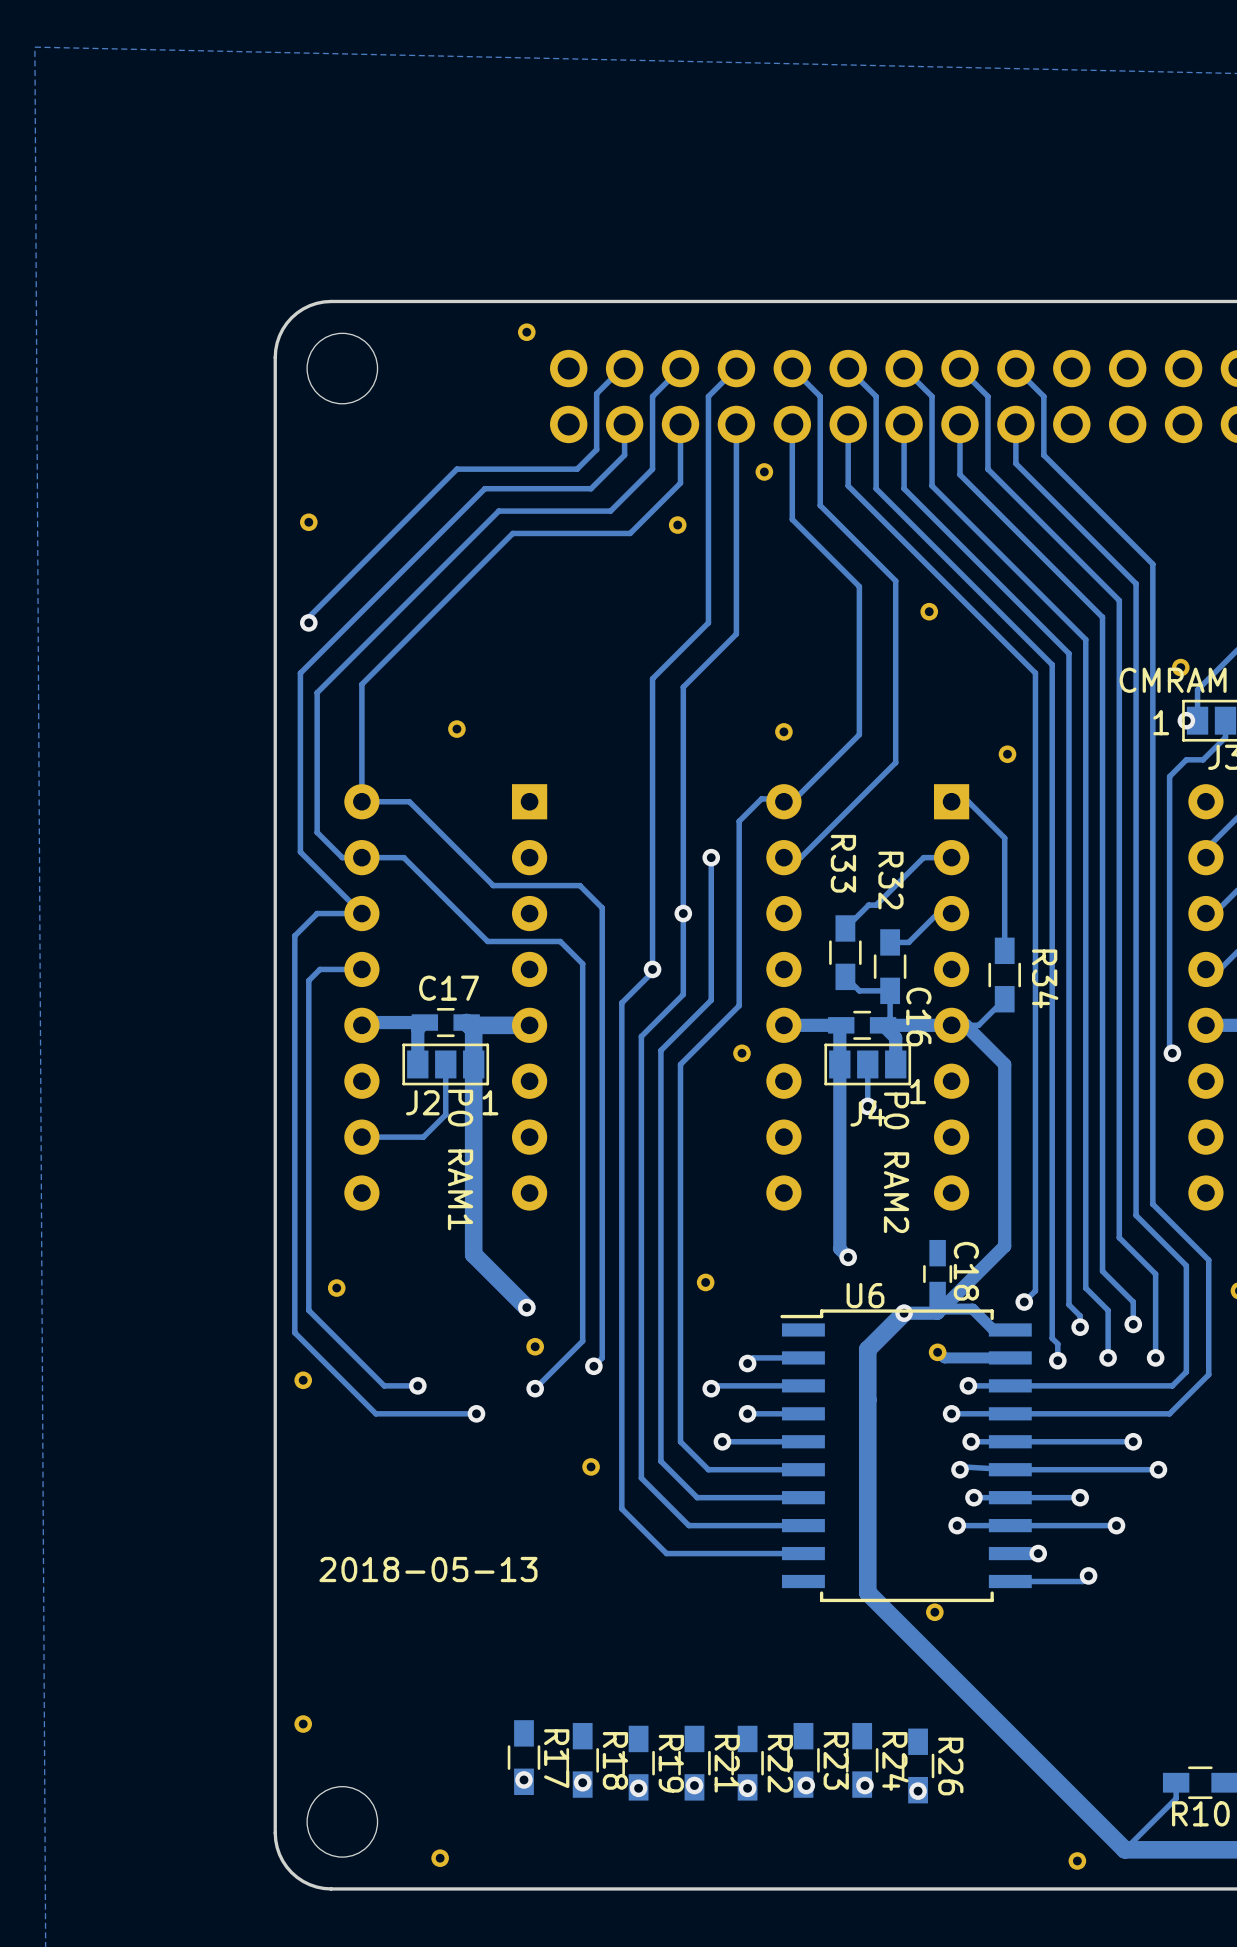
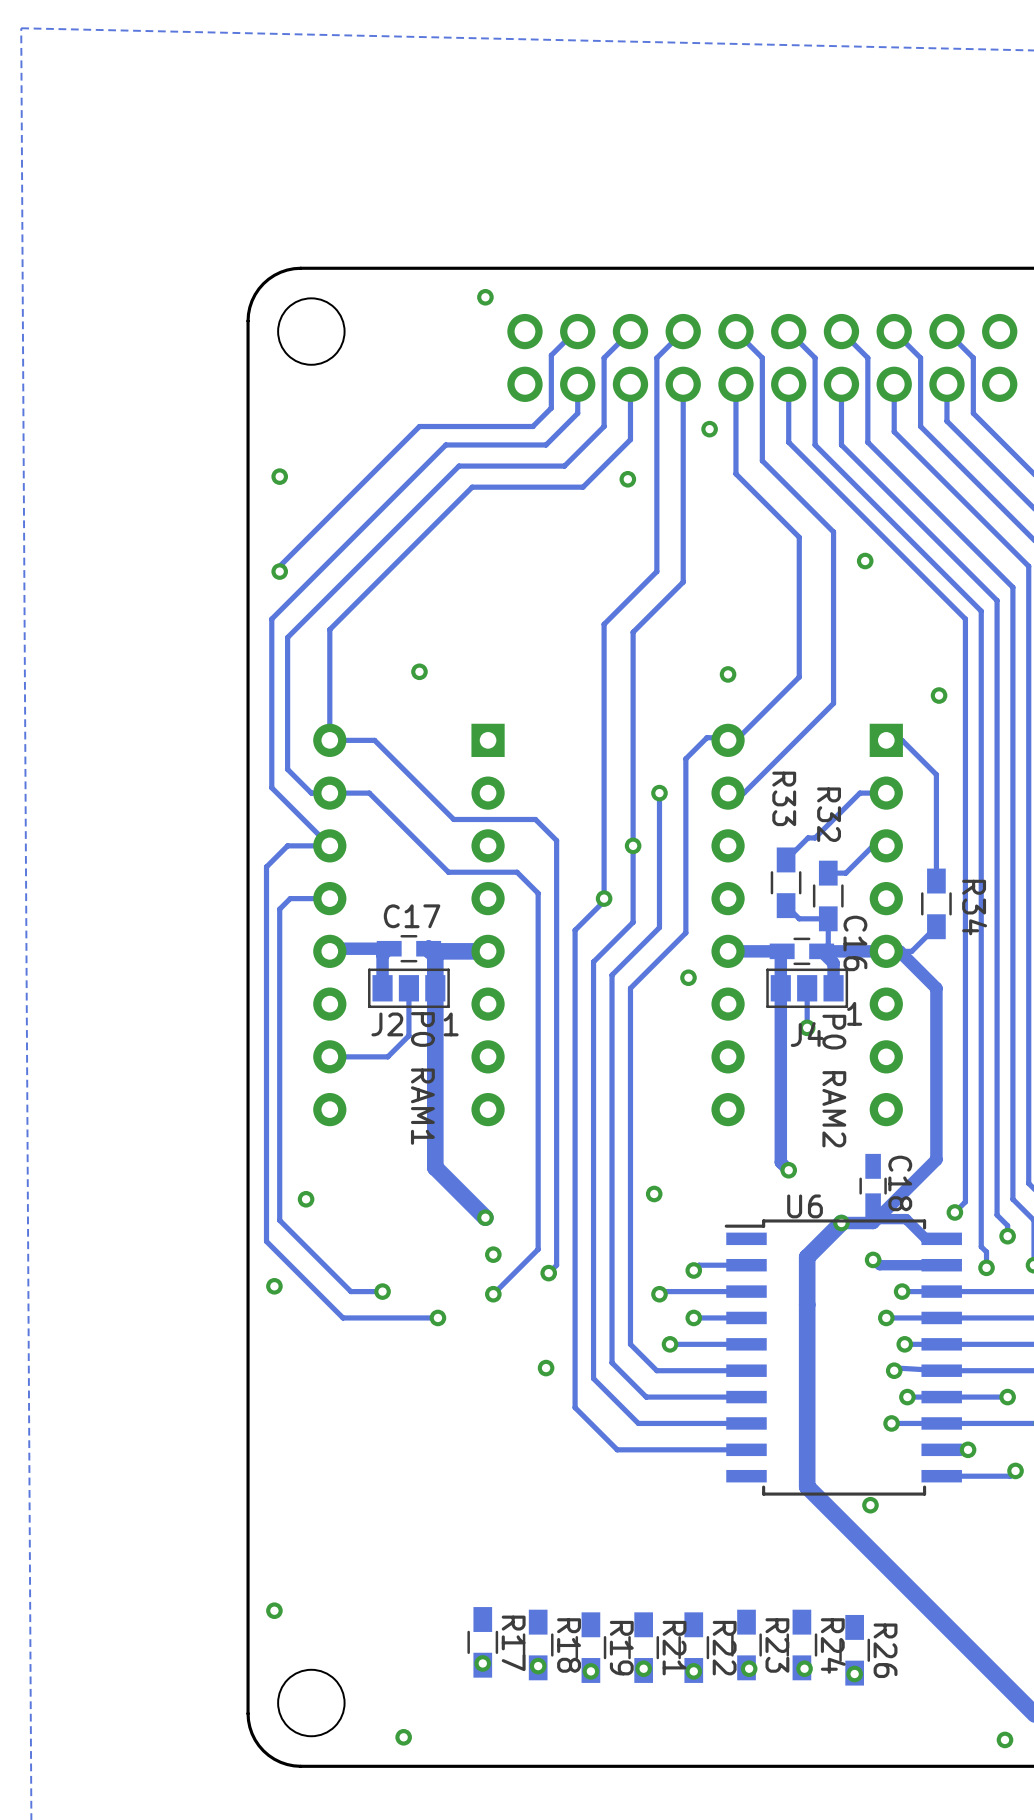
text: 2018-05-13 (428, 1569) -> none

